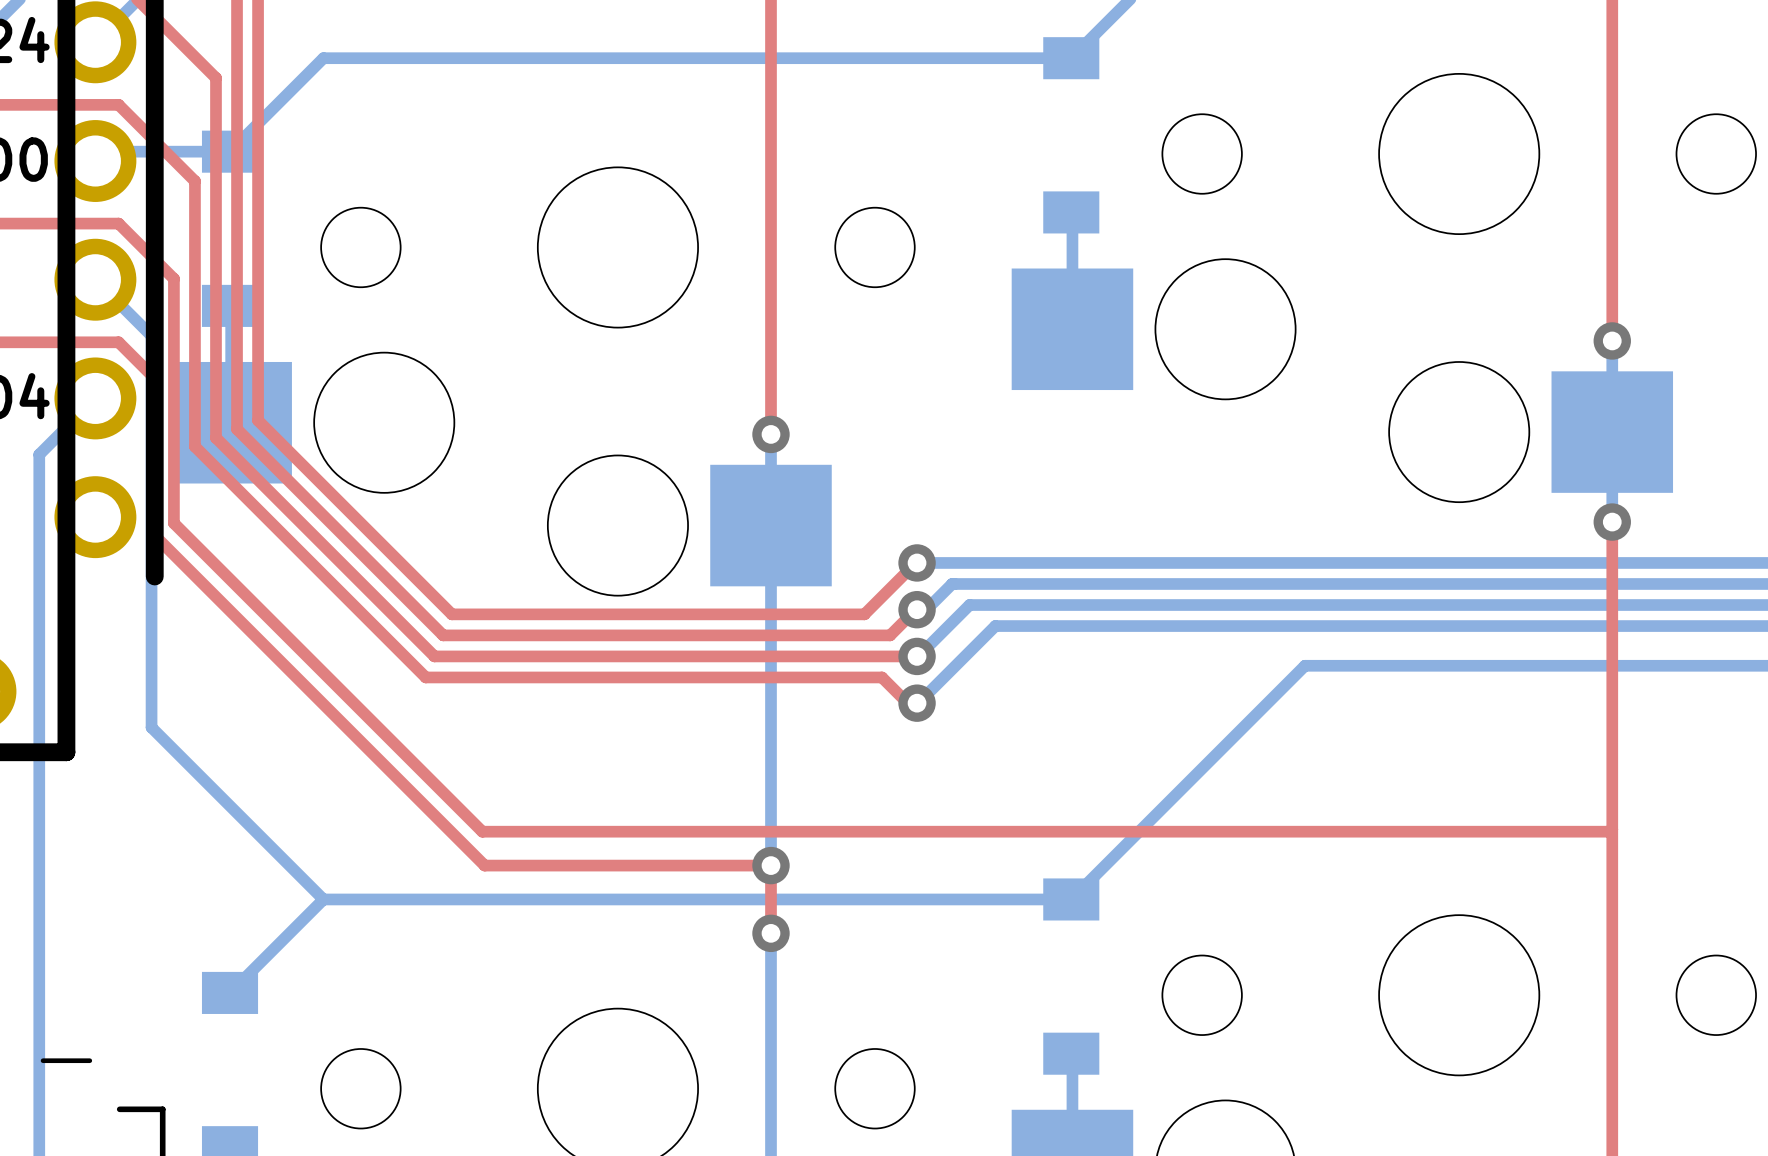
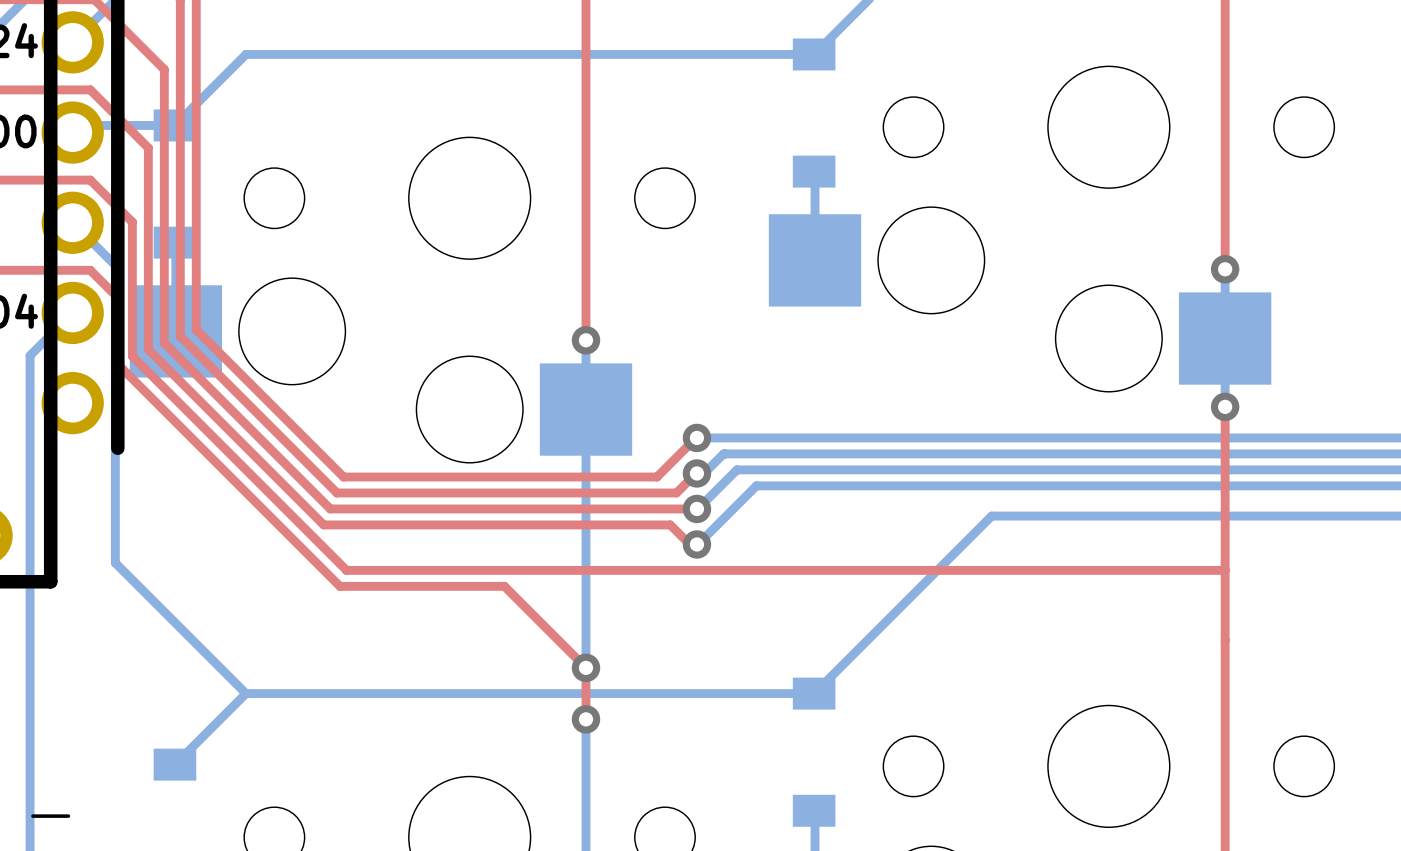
top track: (173, 455) (173, 523) (482, 831) (1609, 831) (1612, 829) -> (132, 356) (346, 570) (1225, 570)
top track: (152, 464) (152, 533) (484, 865) (770, 865) -> (116, 362) (339, 586) (504, 586) (585, 667)

